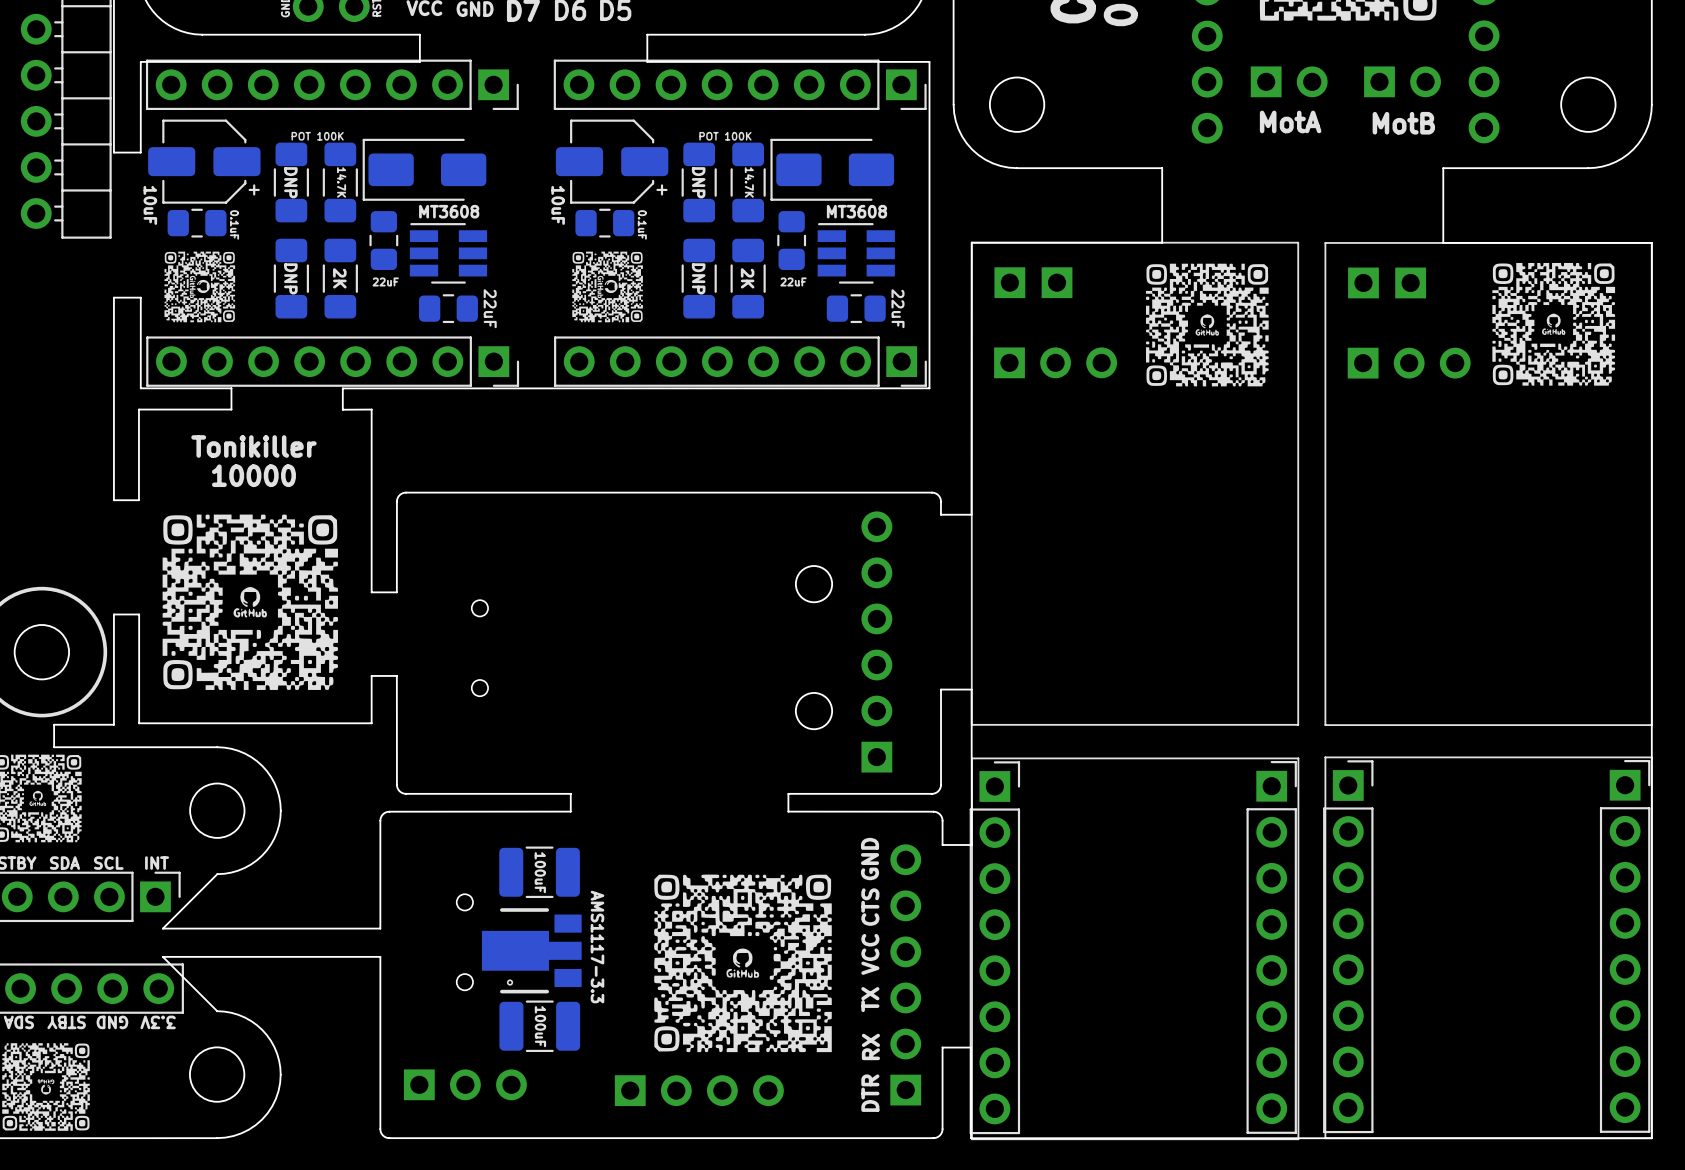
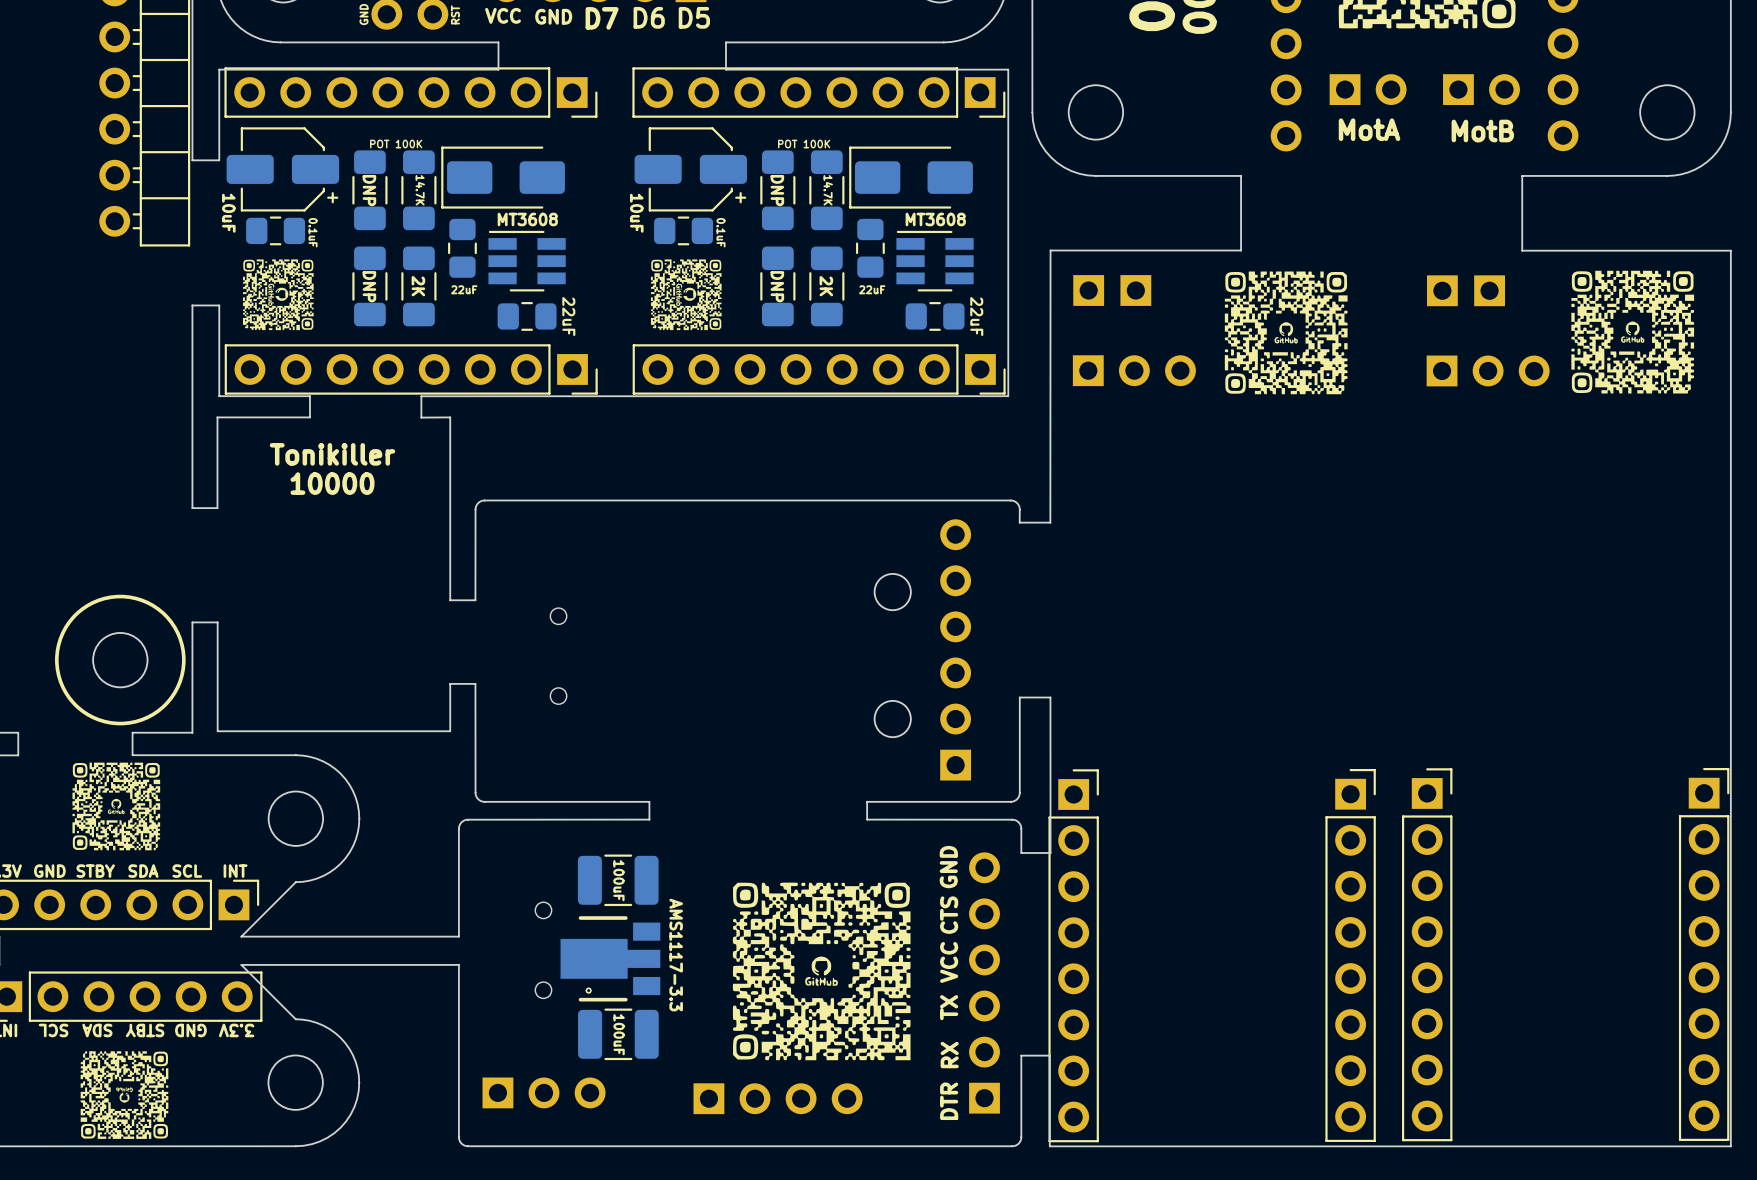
line: (1298, 242) (971, 242) (971, 724) (1298, 724) (1298, 242) -> none
line: (1651, 242) (1651, 725) (1325, 725) (1325, 242) (1651, 242) -> none
drawing: [162, 514, 338, 690] -> none
line: (1651, 757) (1325, 757) (1325, 1138) (1651, 1138) (1651, 757) -> none
line: (1298, 758) (971, 758) (971, 1139) (1298, 1139) (1298, 758) -> none

